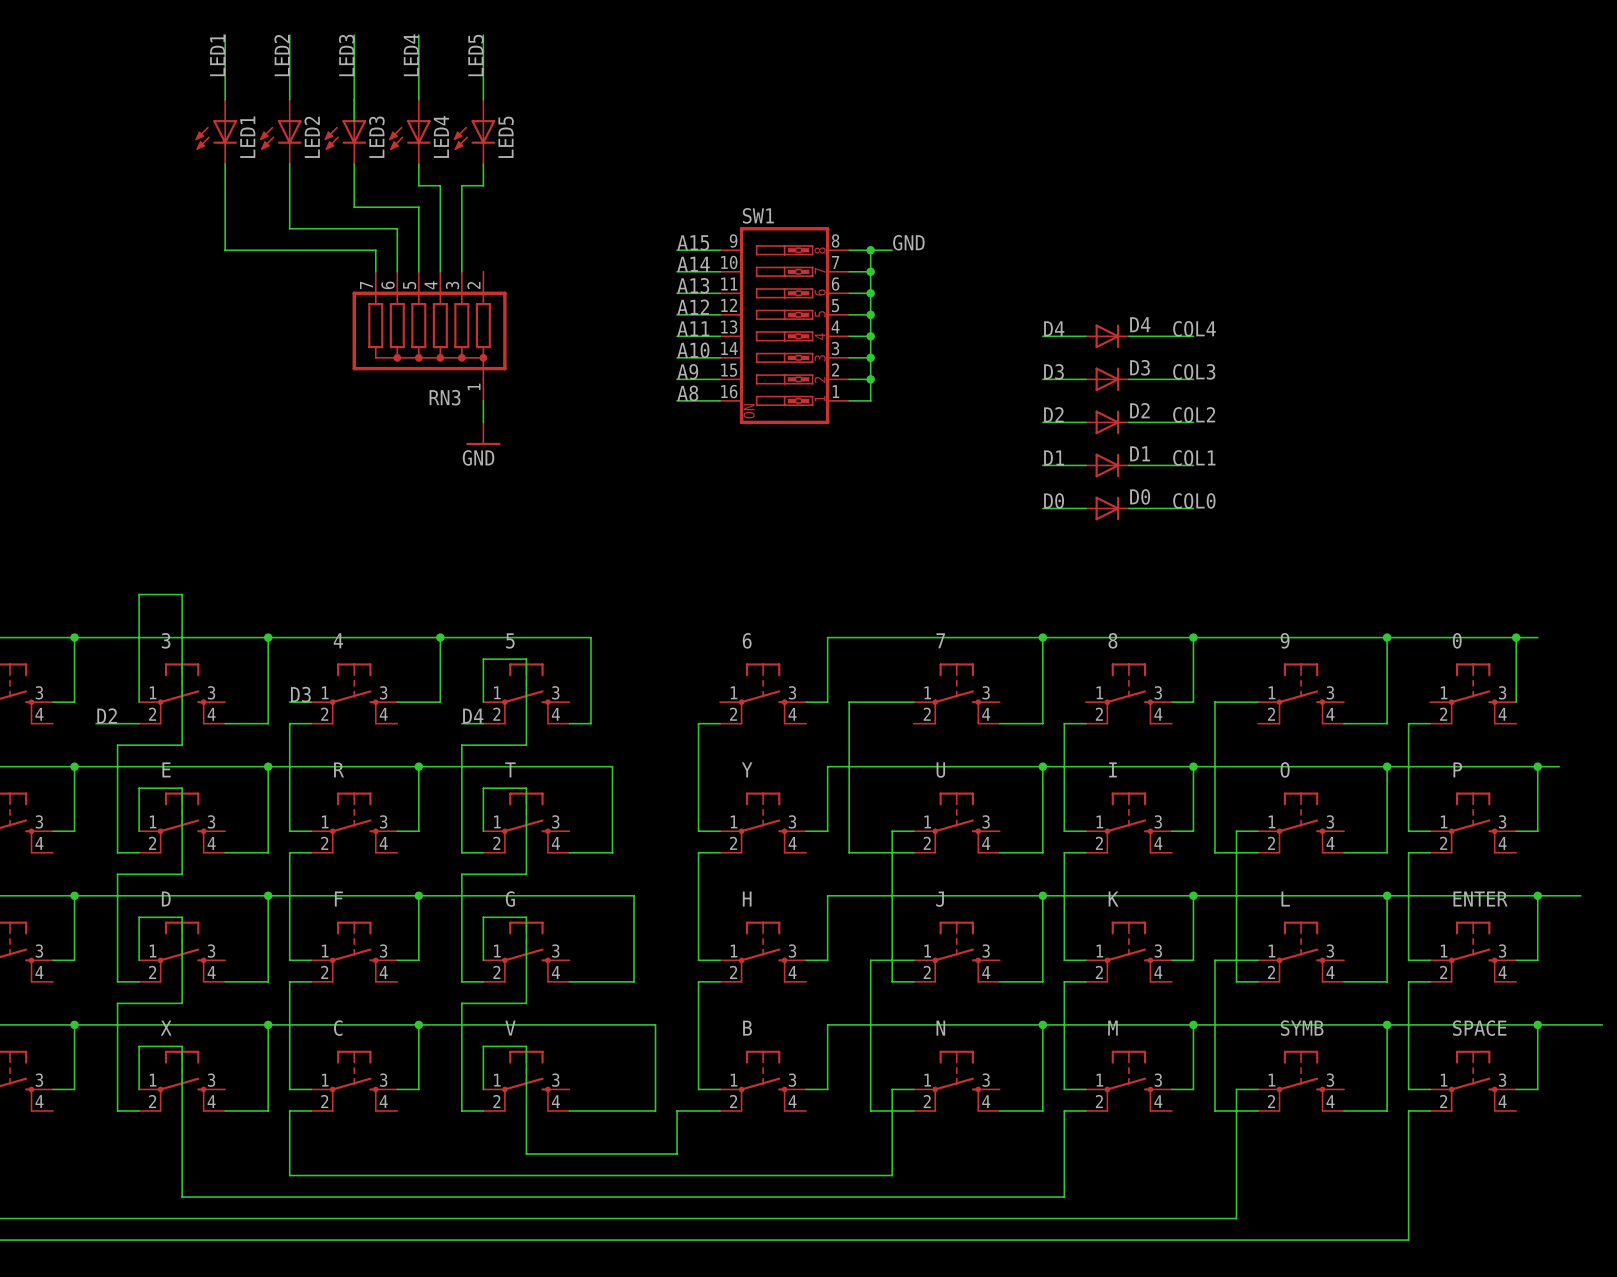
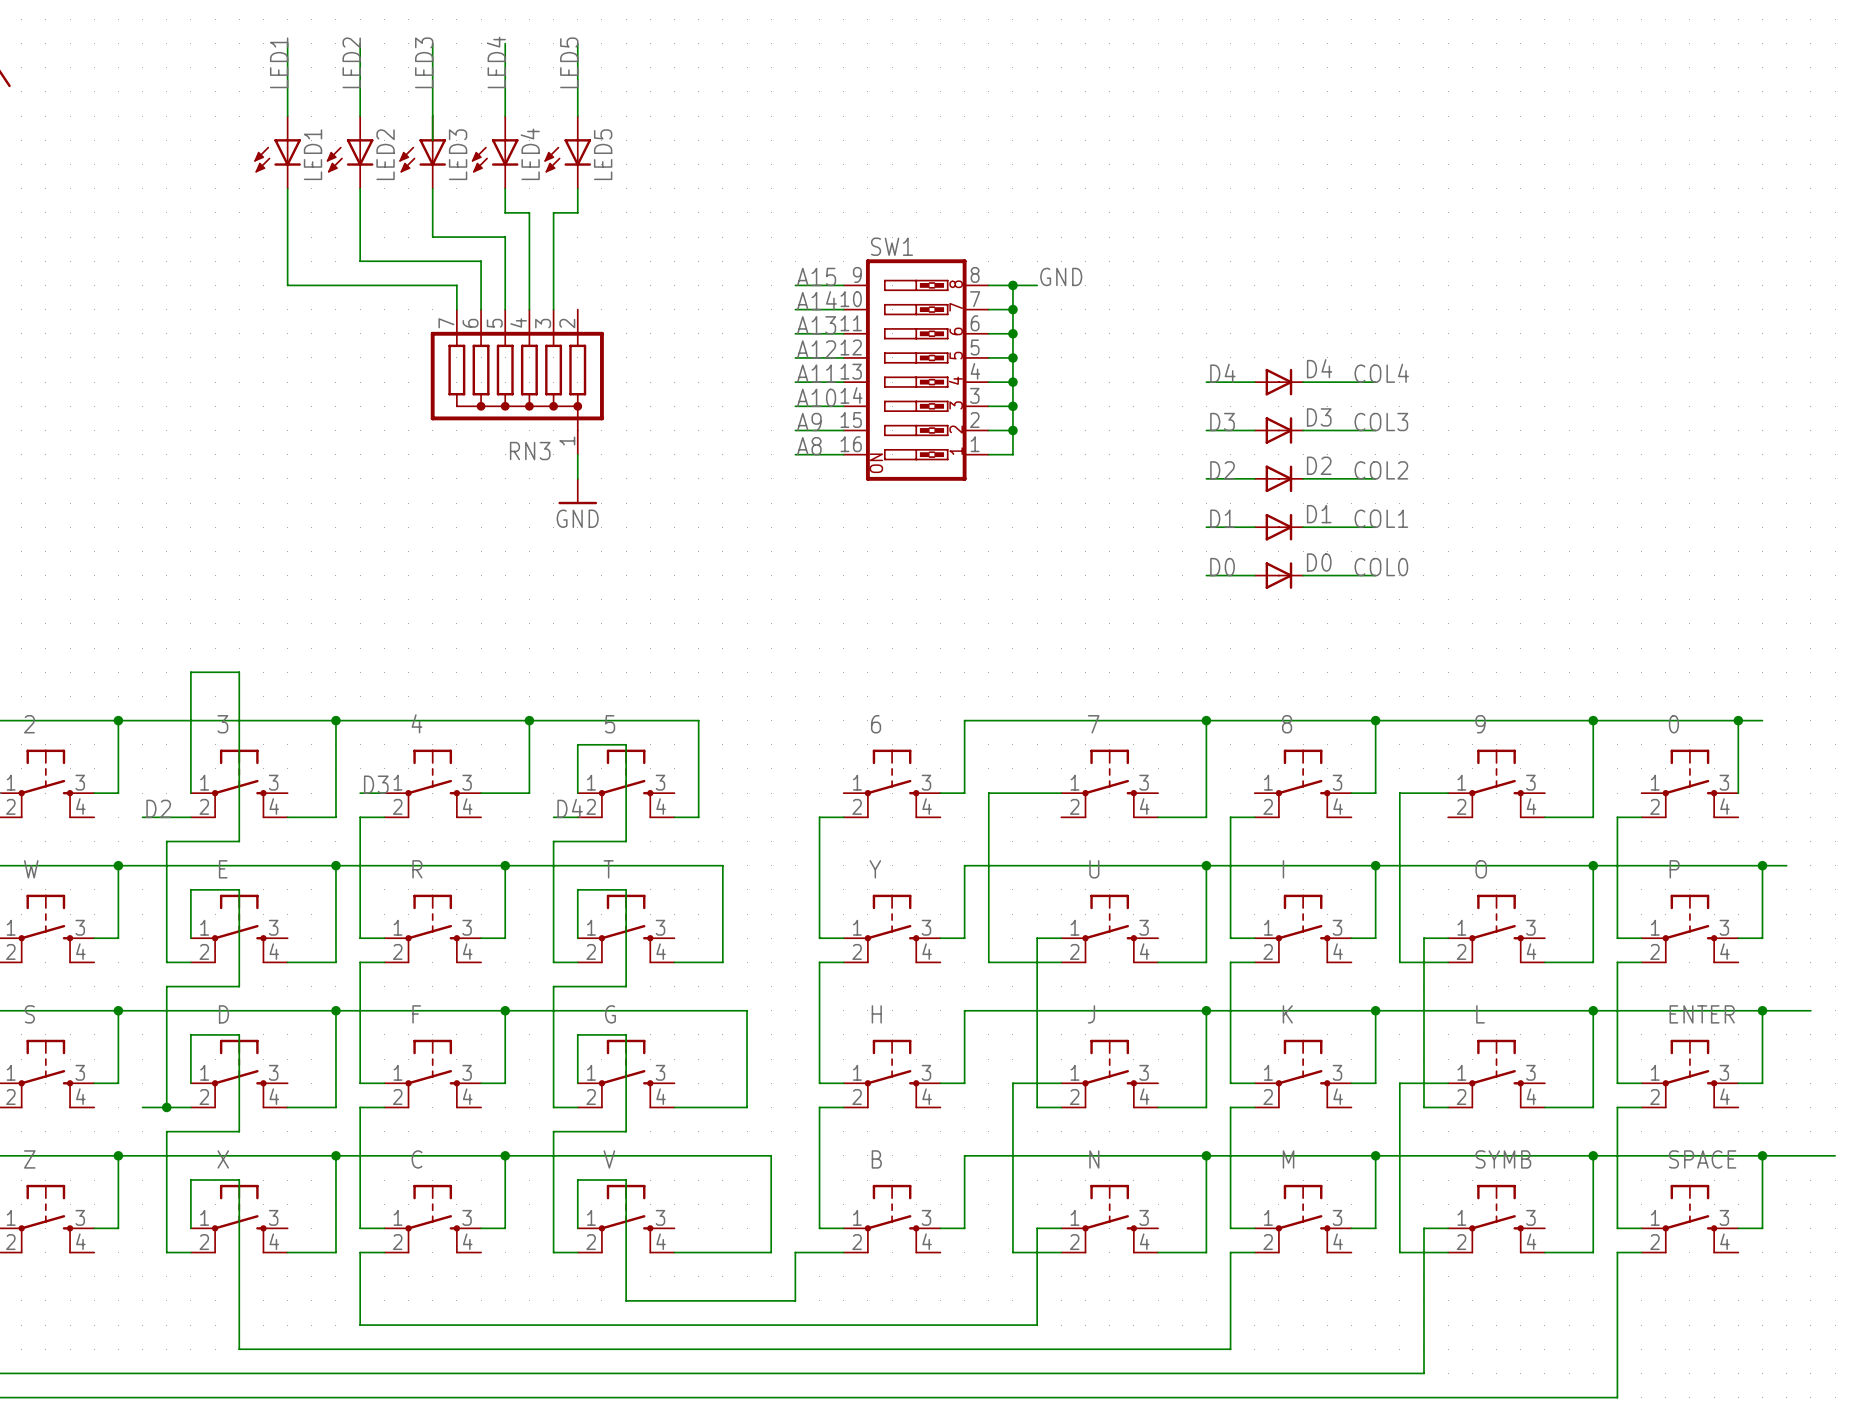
wire: none -> (142, 1107) (166, 1107)
junction: none -> (166, 1107)

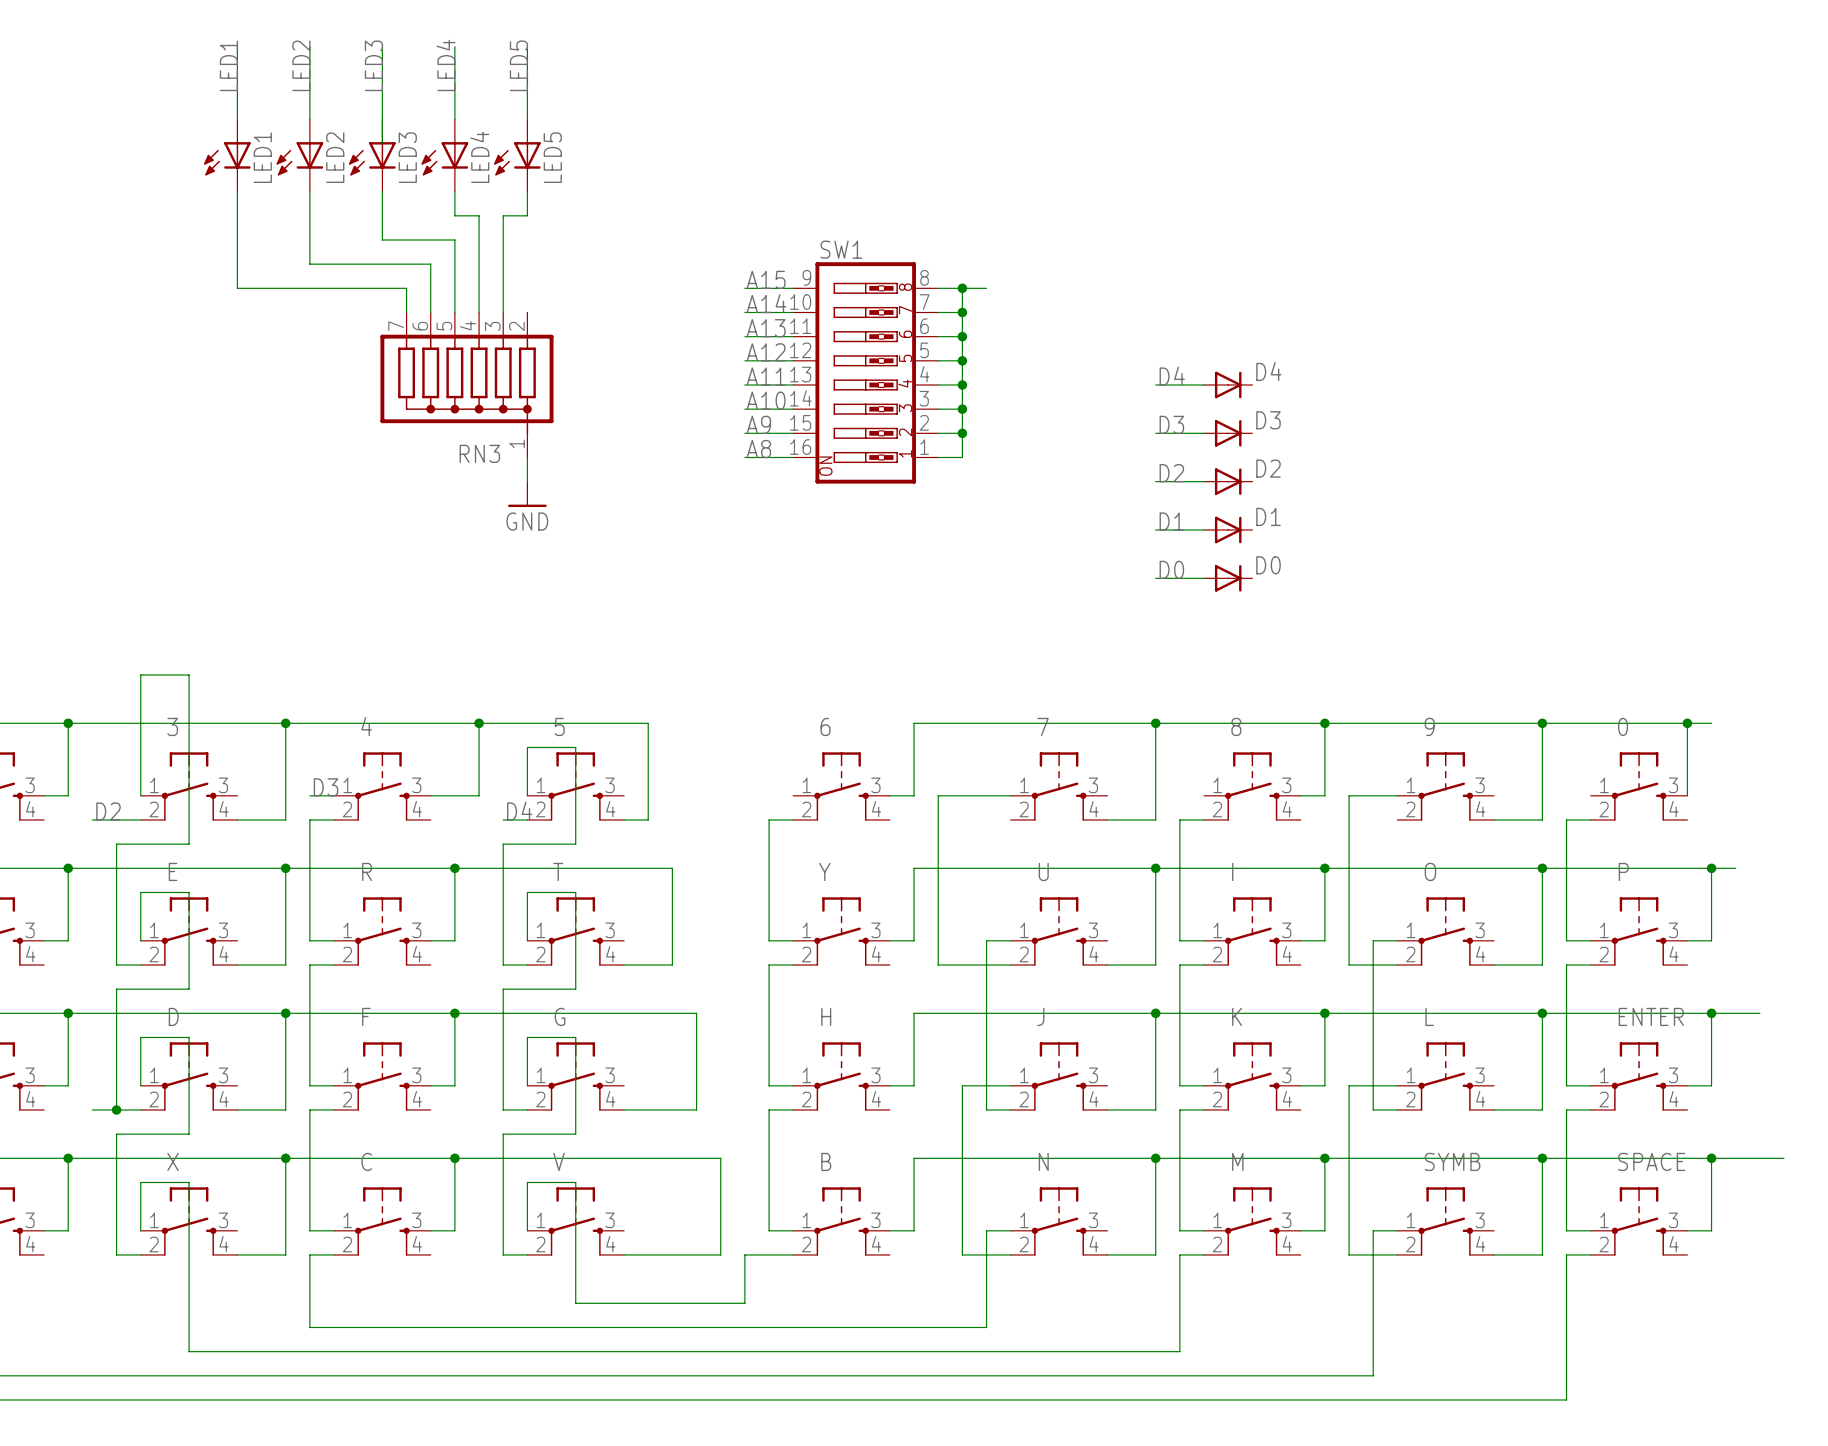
label: GND (1061, 276) -> none
label: COL4 (1381, 373) -> none
wire: (1303, 382) (1375, 382) -> none
label: COL3 (1381, 422) -> none
wire: (1303, 430) (1375, 430) -> none
label: COL2 (1381, 470) -> none
wire: (1303, 478) (1375, 478) -> none
label: COL1 (1381, 518) -> none
wire: (1303, 527) (1375, 527) -> none
label: COL0 (1381, 567) -> none
wire: (1303, 575) (1375, 575) -> none

